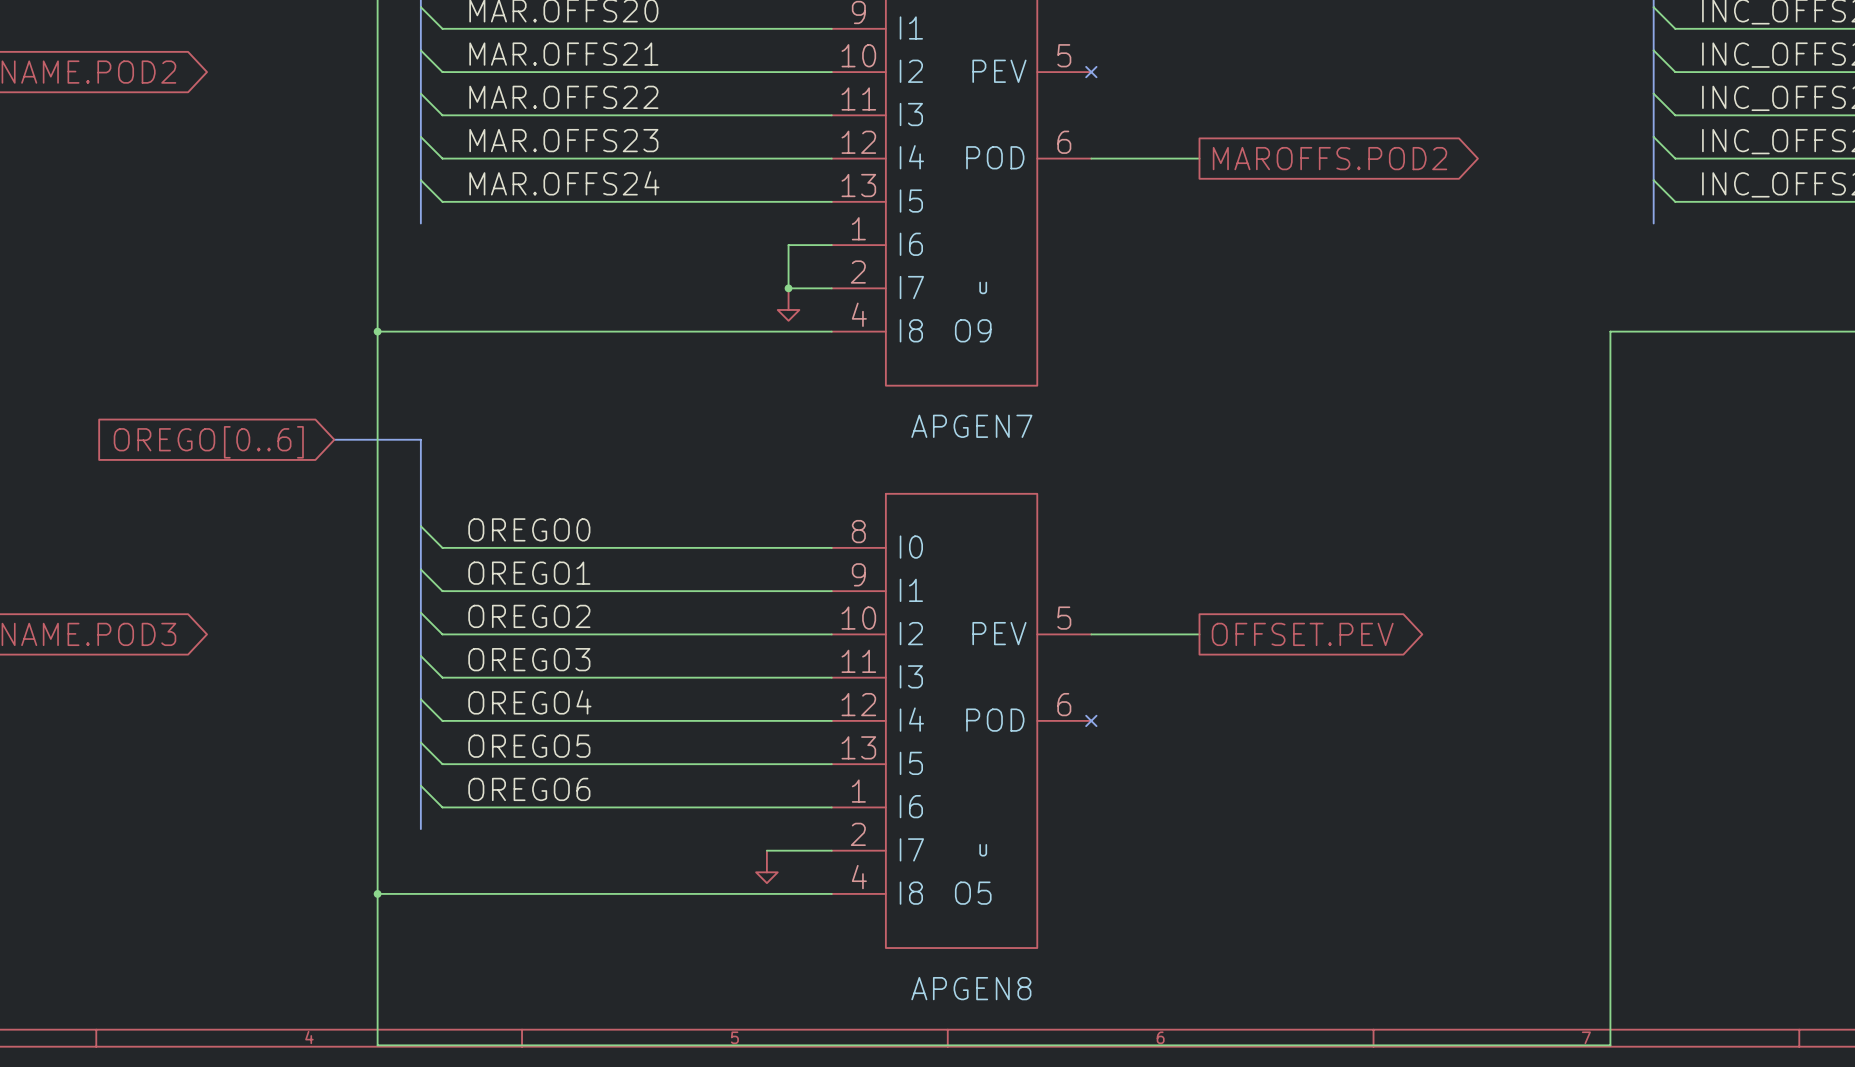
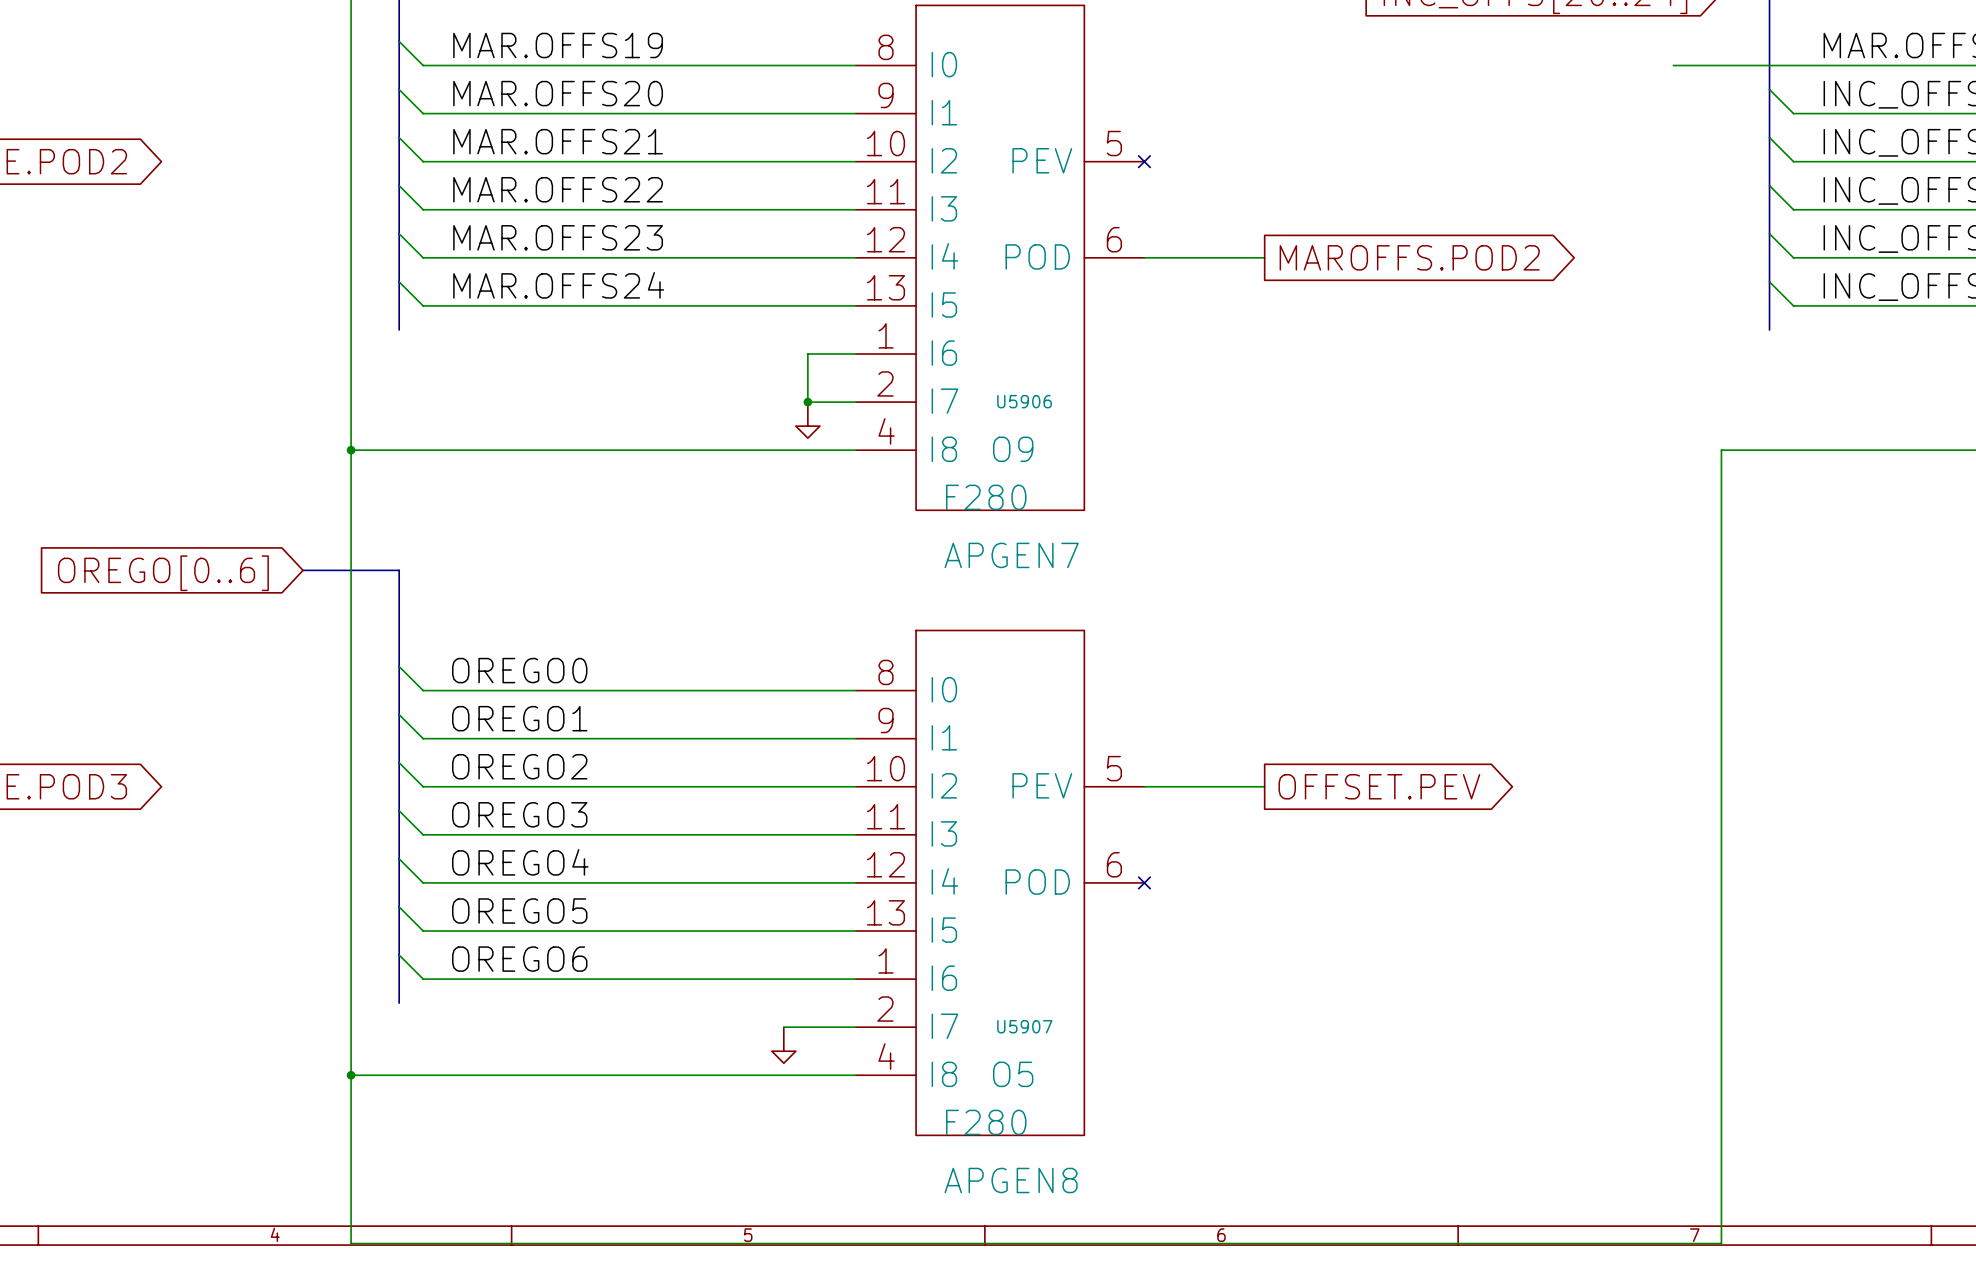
U name: U (983, 287) -> U5906 (1024, 401)
U value: none -> F280 (986, 497)
U name: U (983, 850) -> U5907 (1024, 1026)
U value: none -> F280 (986, 1122)

